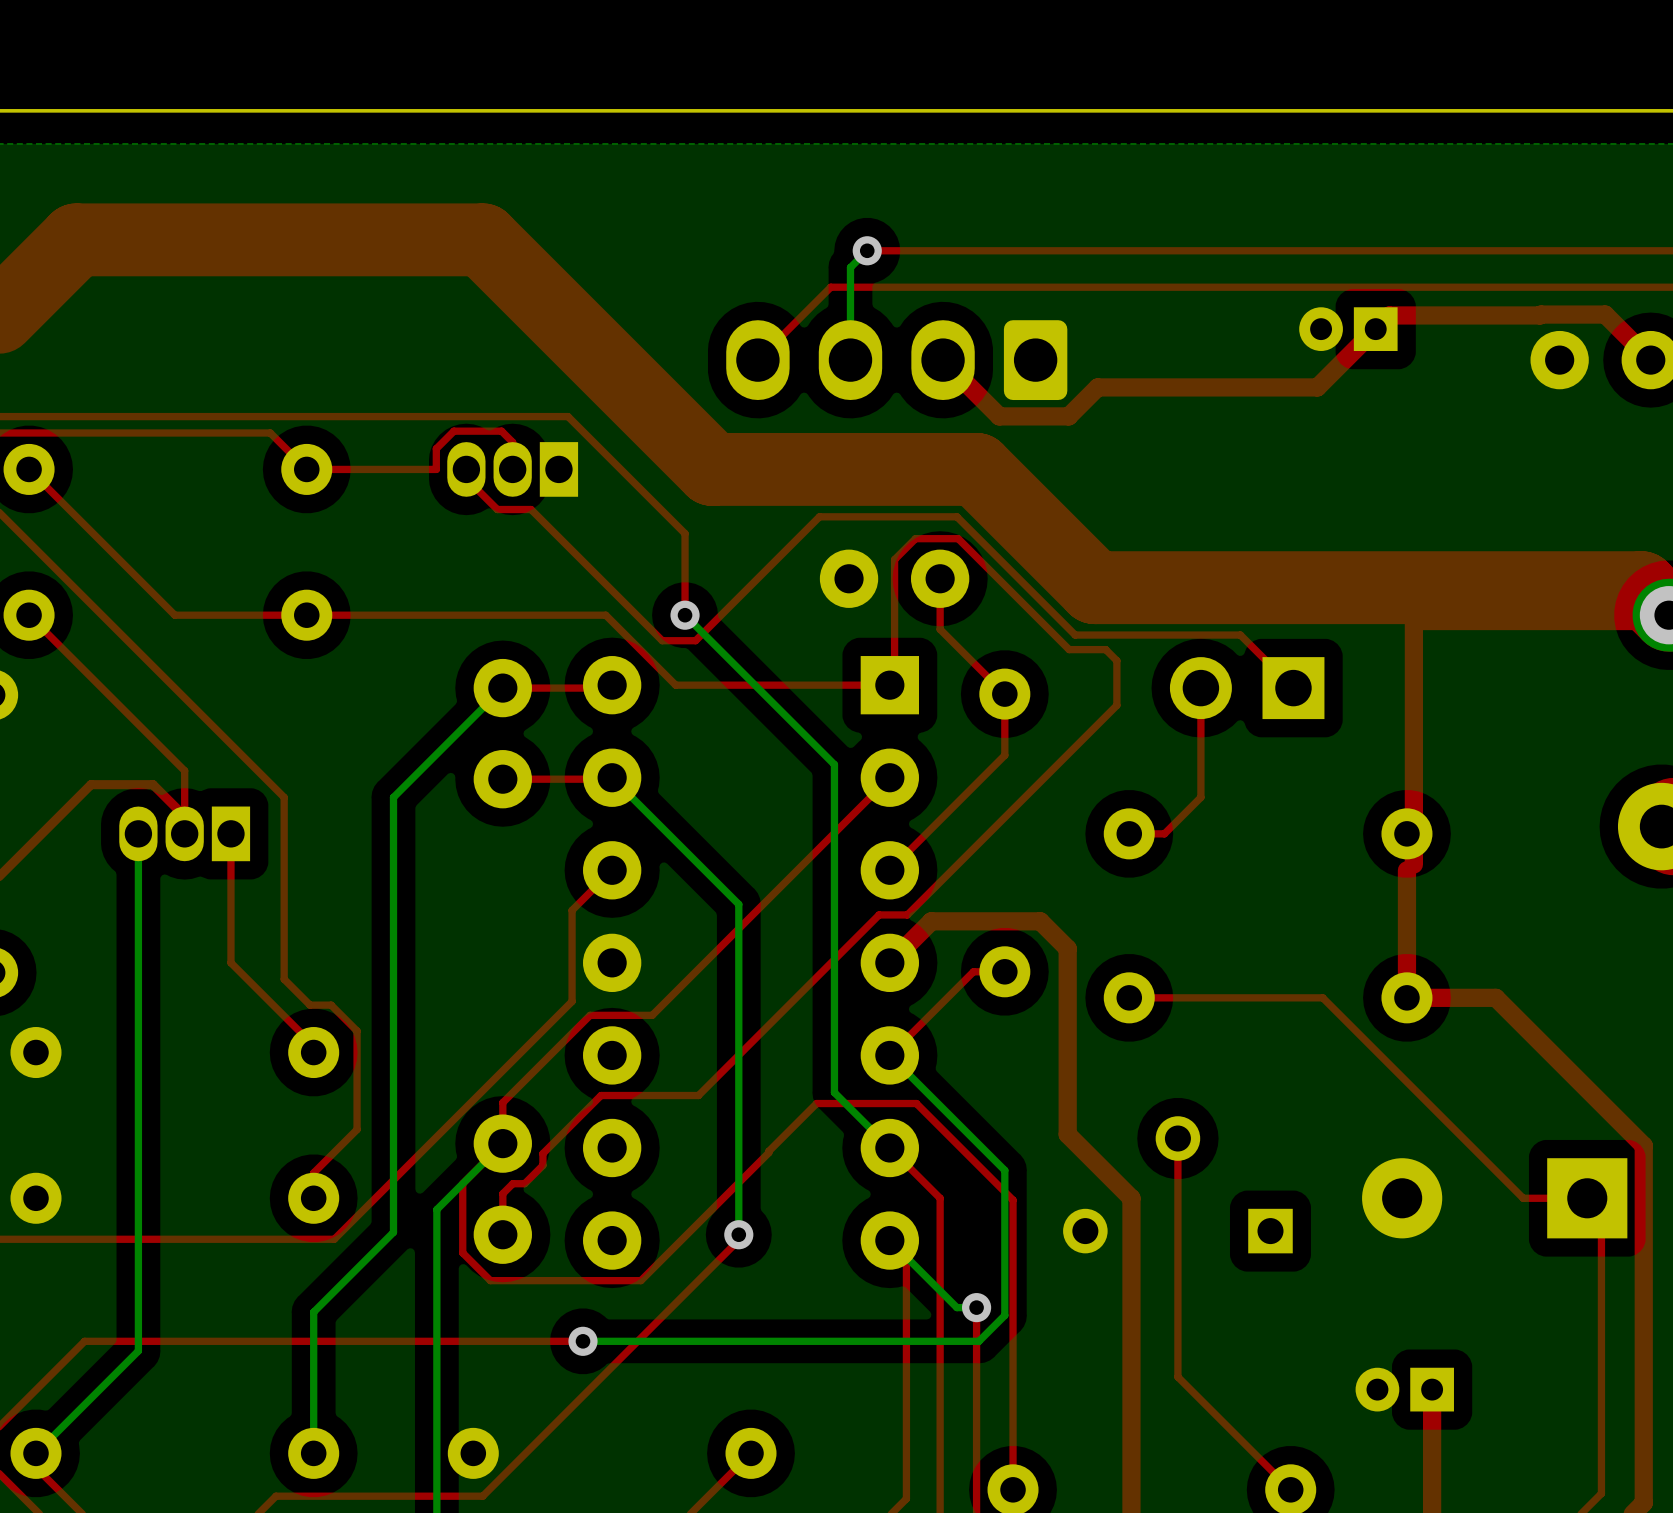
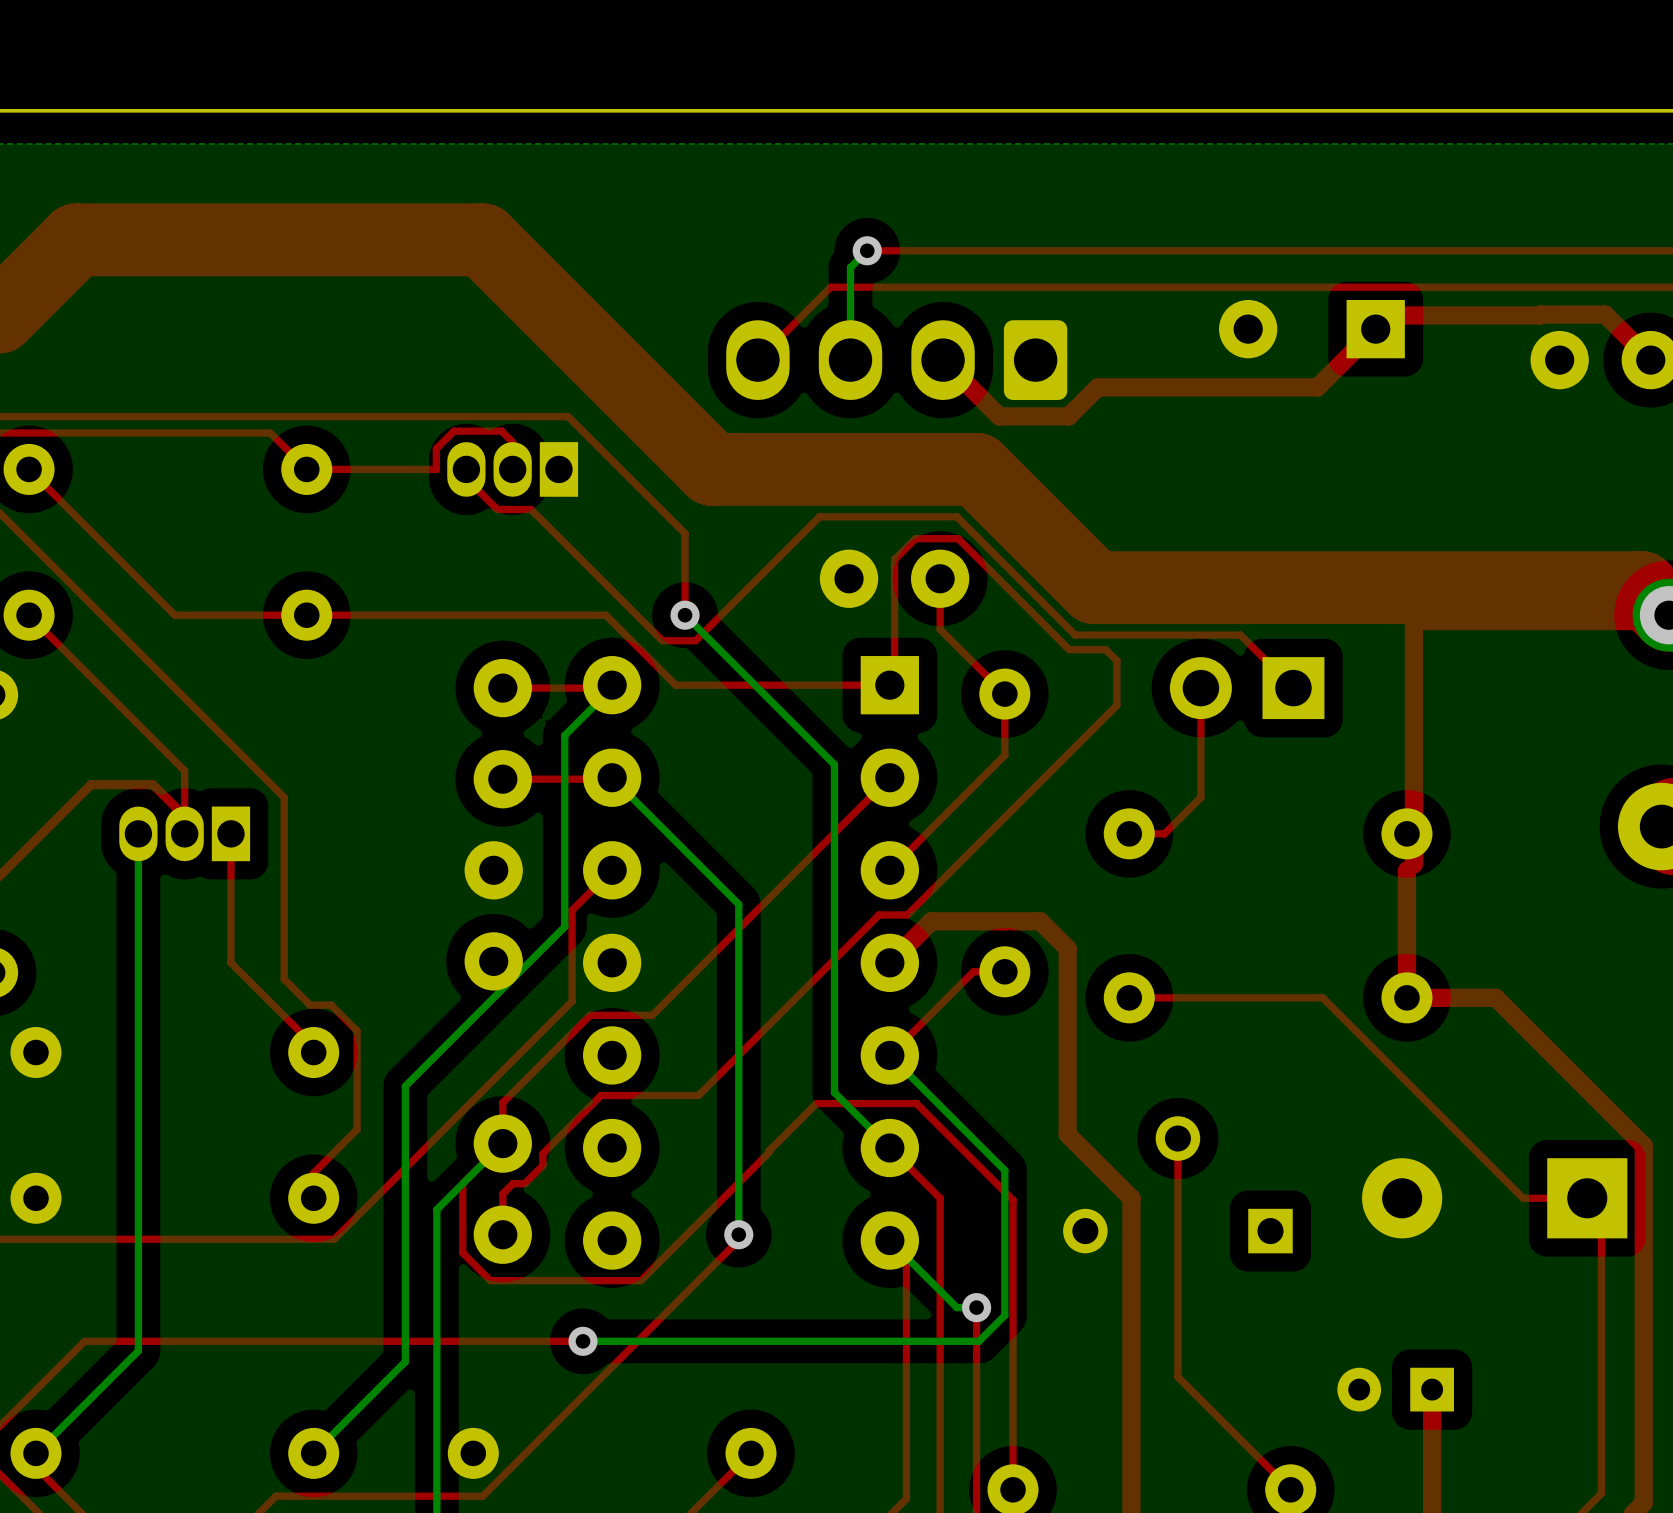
part footprint: [1299, 307, 1398, 351] -> [1219, 299, 1405, 359]
bottom track: (502, 688) (393, 797) (393, 1232) (313, 1312) (313, 1453) -> (612, 685) (612, 688) (564, 735) (564, 926) (405, 1086) (405, 1361) (313, 1453)
part: none -> (493, 915)
part footprint: [1355, 1367, 1454, 1412] -> [1337, 1367, 1454, 1412]

